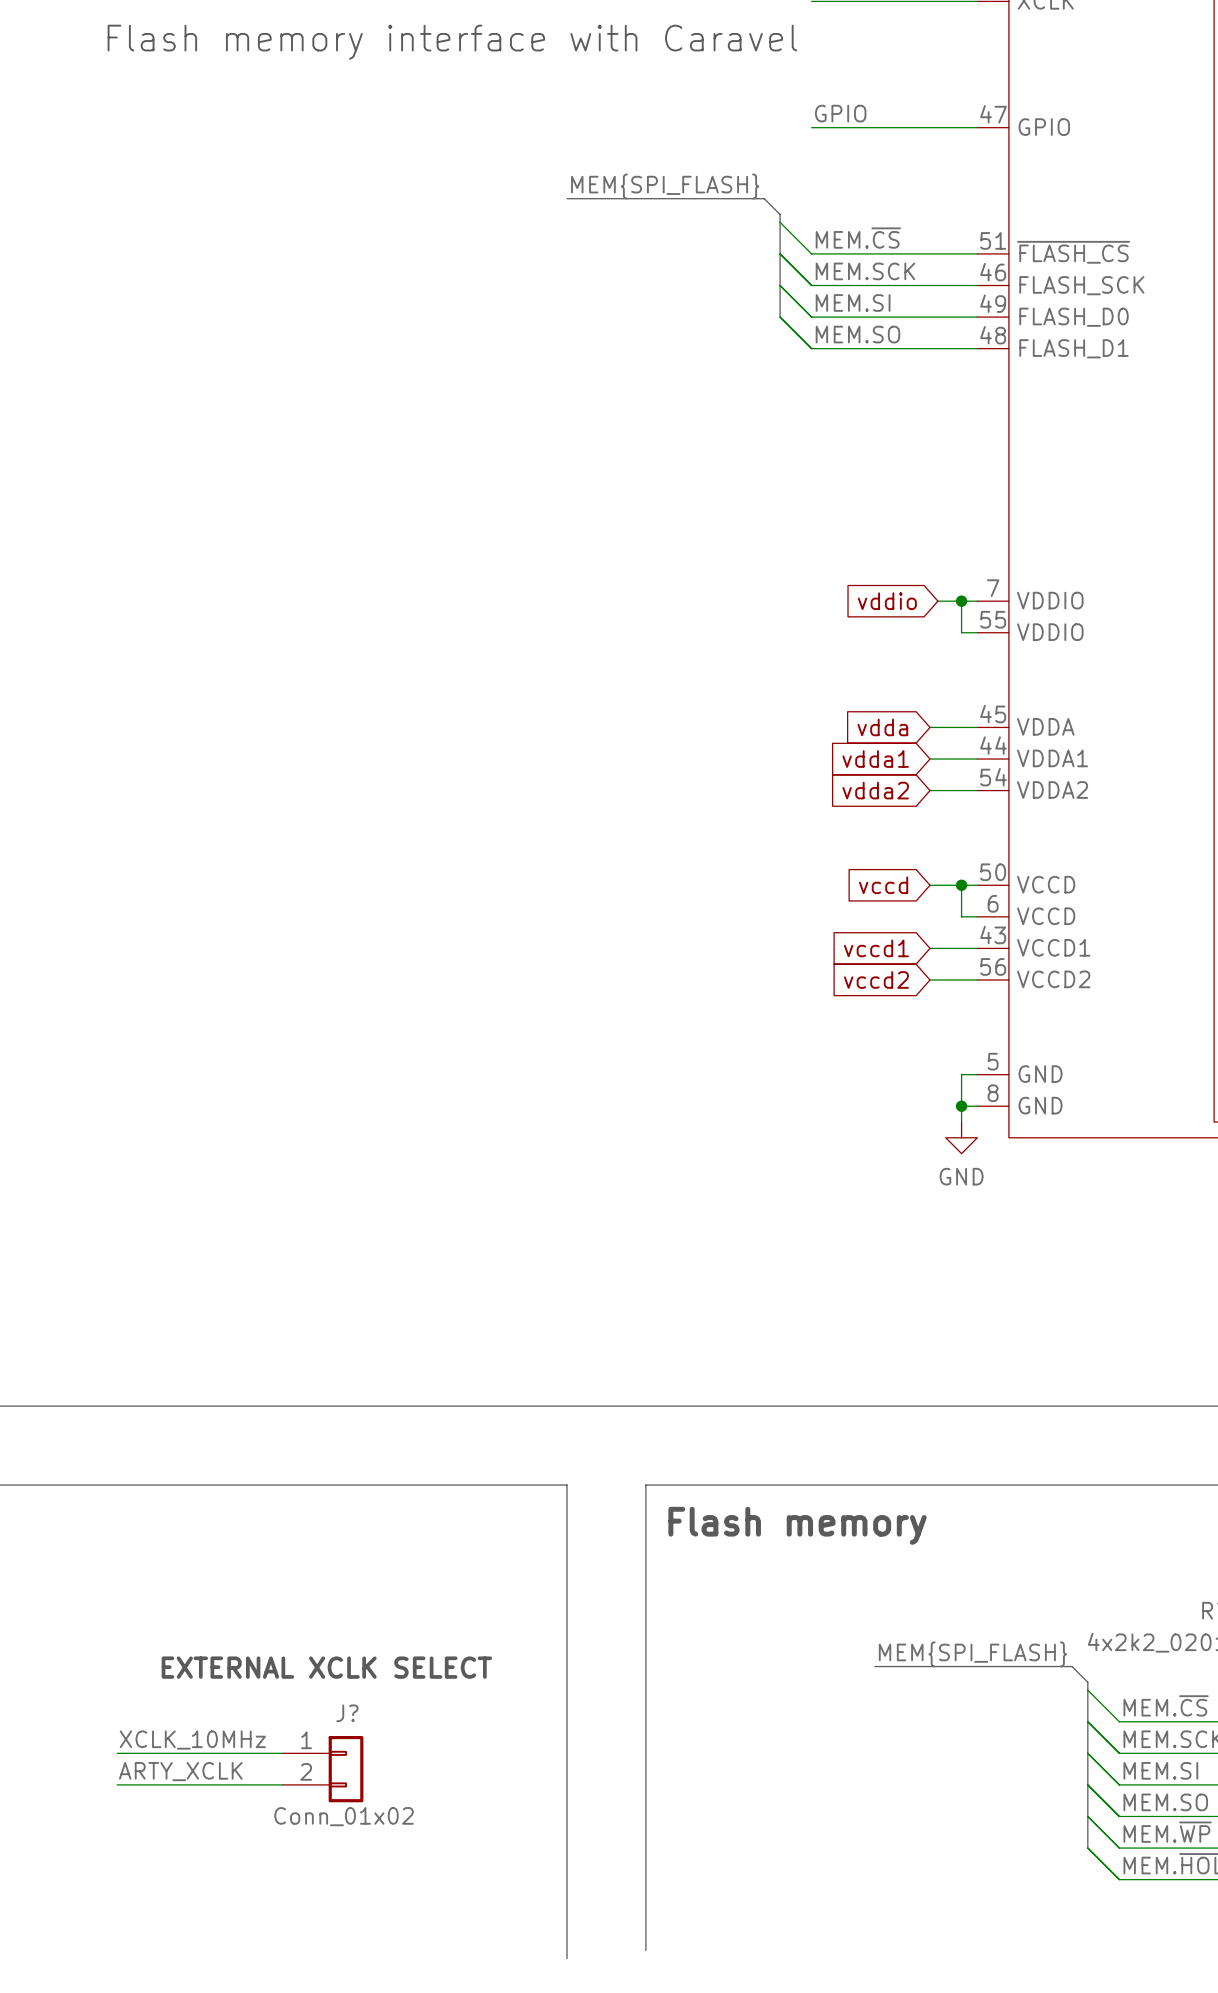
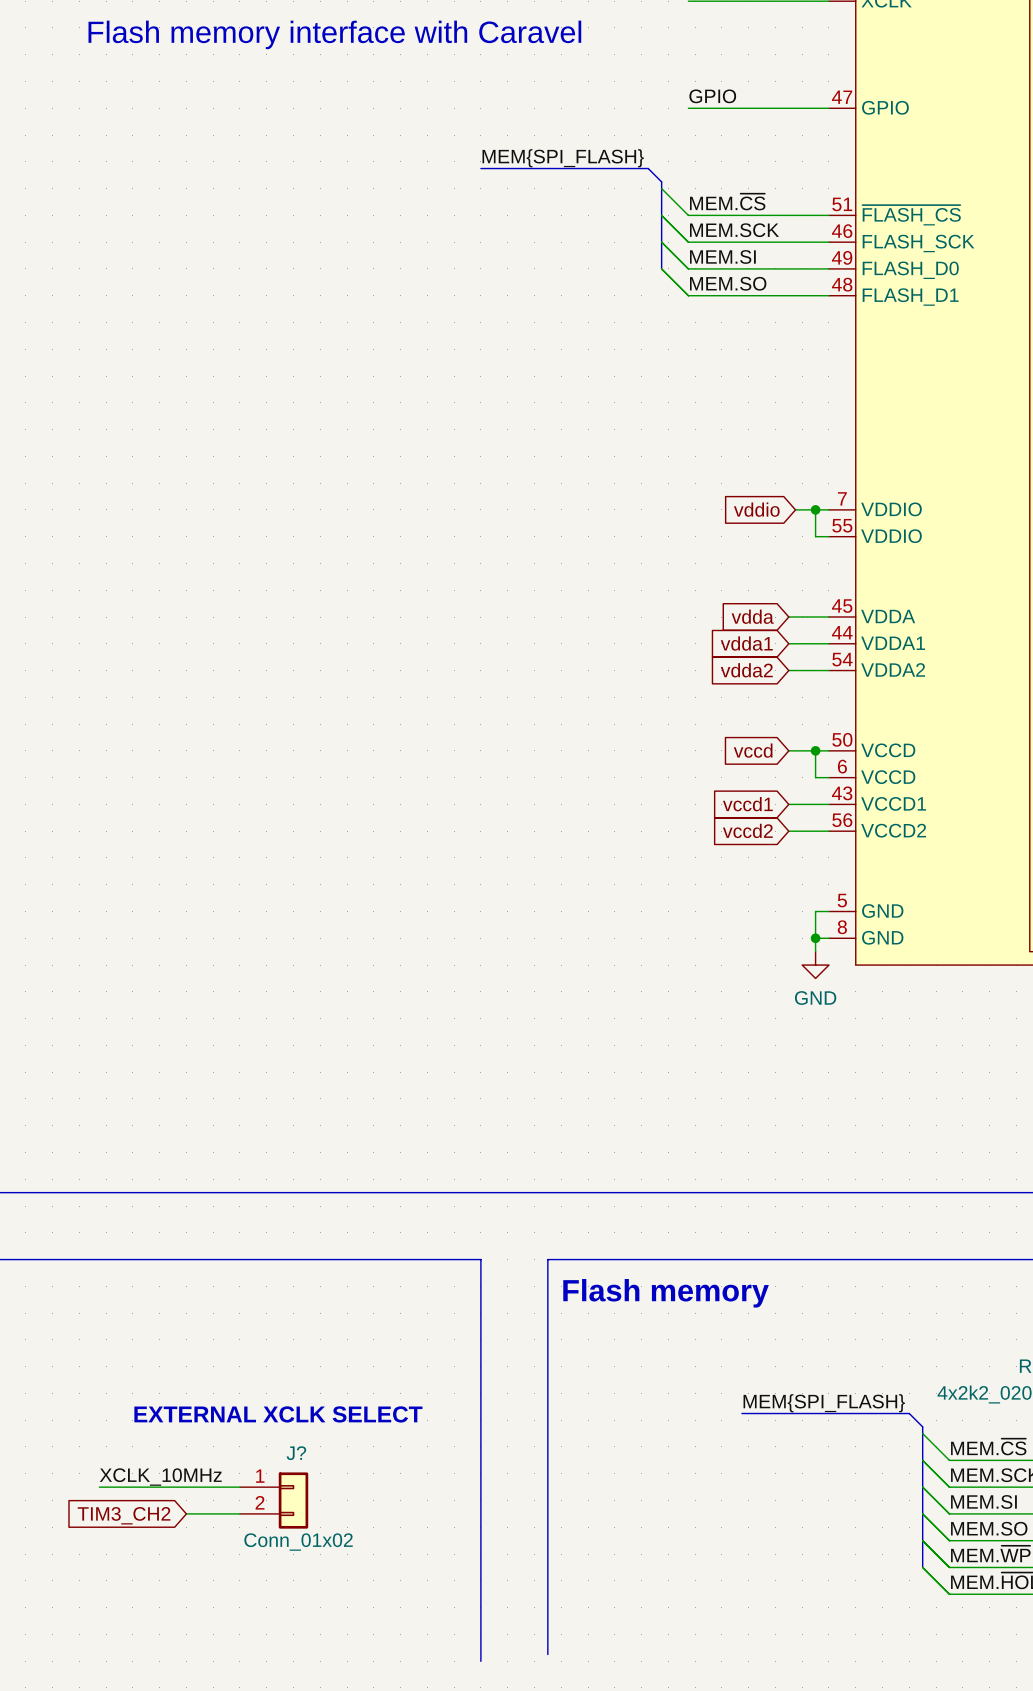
label: ARTY_XCLK (180, 1771) -> none
wire: (117, 1784) (219, 1784) -> none
global label: none -> TIM3_CH2 (124, 1515)

